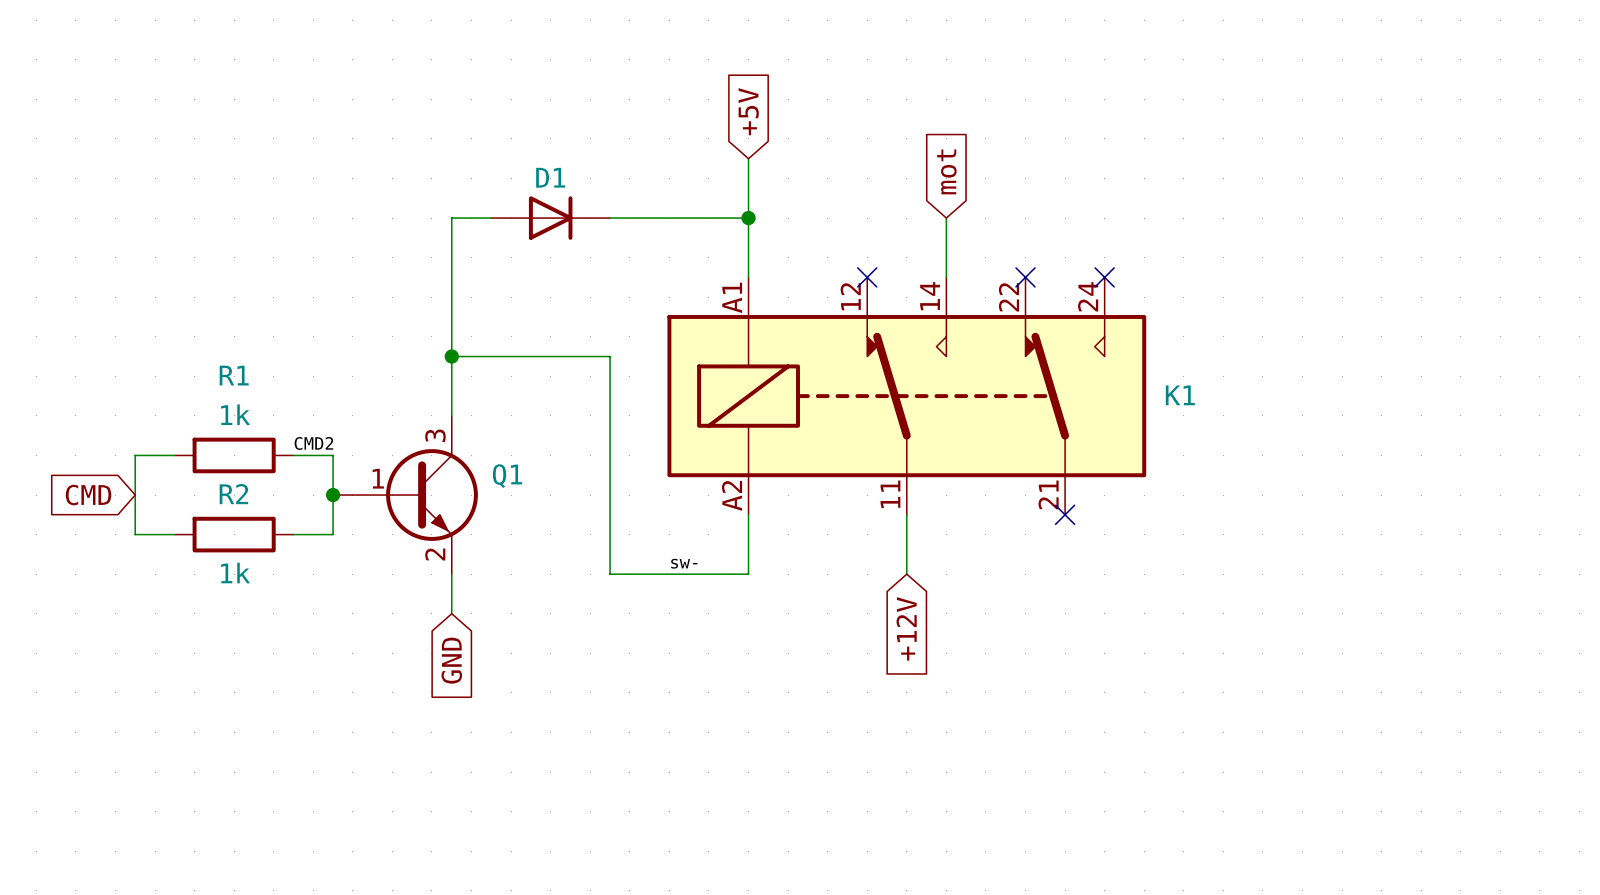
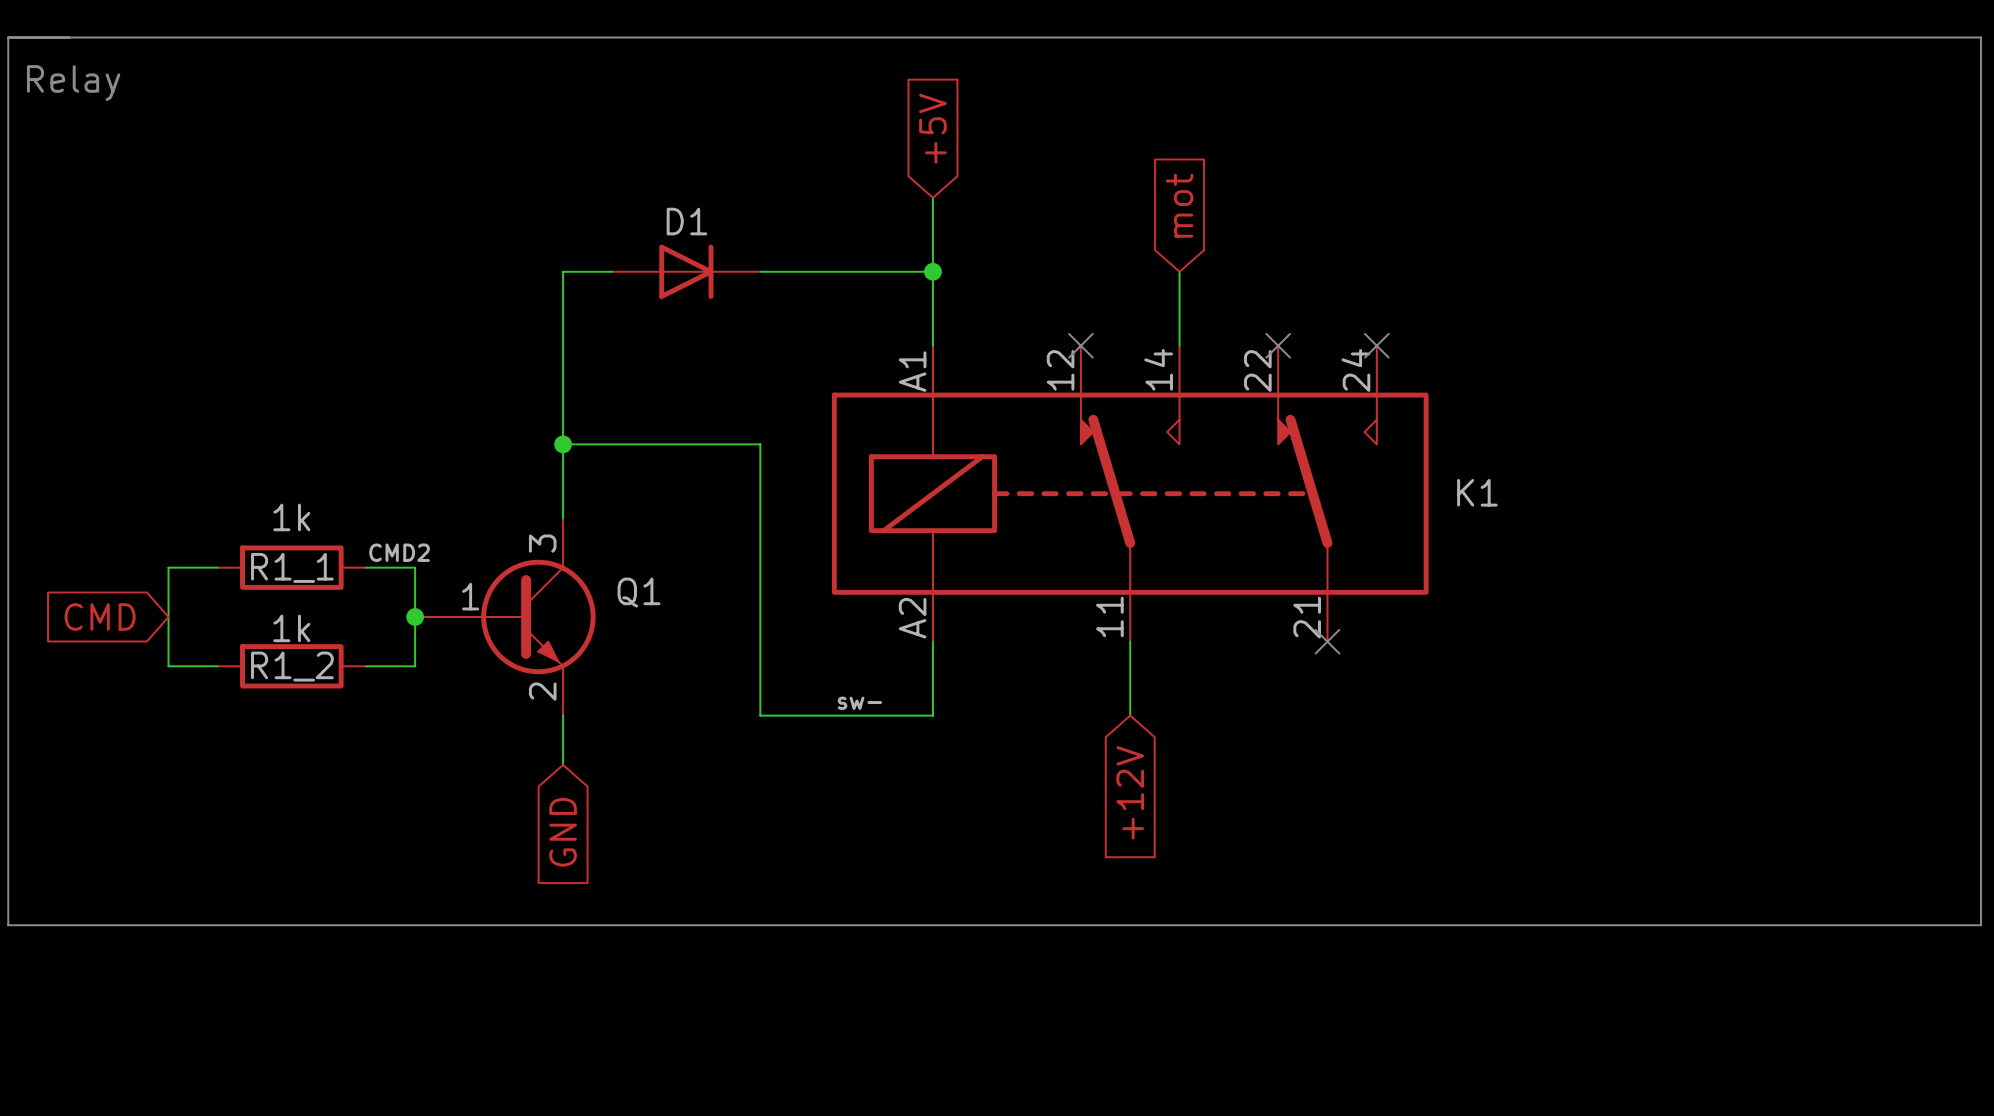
line: none -> (8, 37) (8, 925) (1980, 925) (1980, 37) (8, 37)
text: none -> Relay (73, 83)
R1 name: R1 (234, 375) -> R1_1 (292, 567)
R2 name: R2 (233, 494) -> R1_2 (292, 666)
R2 value position: 1k (235, 573) -> 1k (291, 628)

